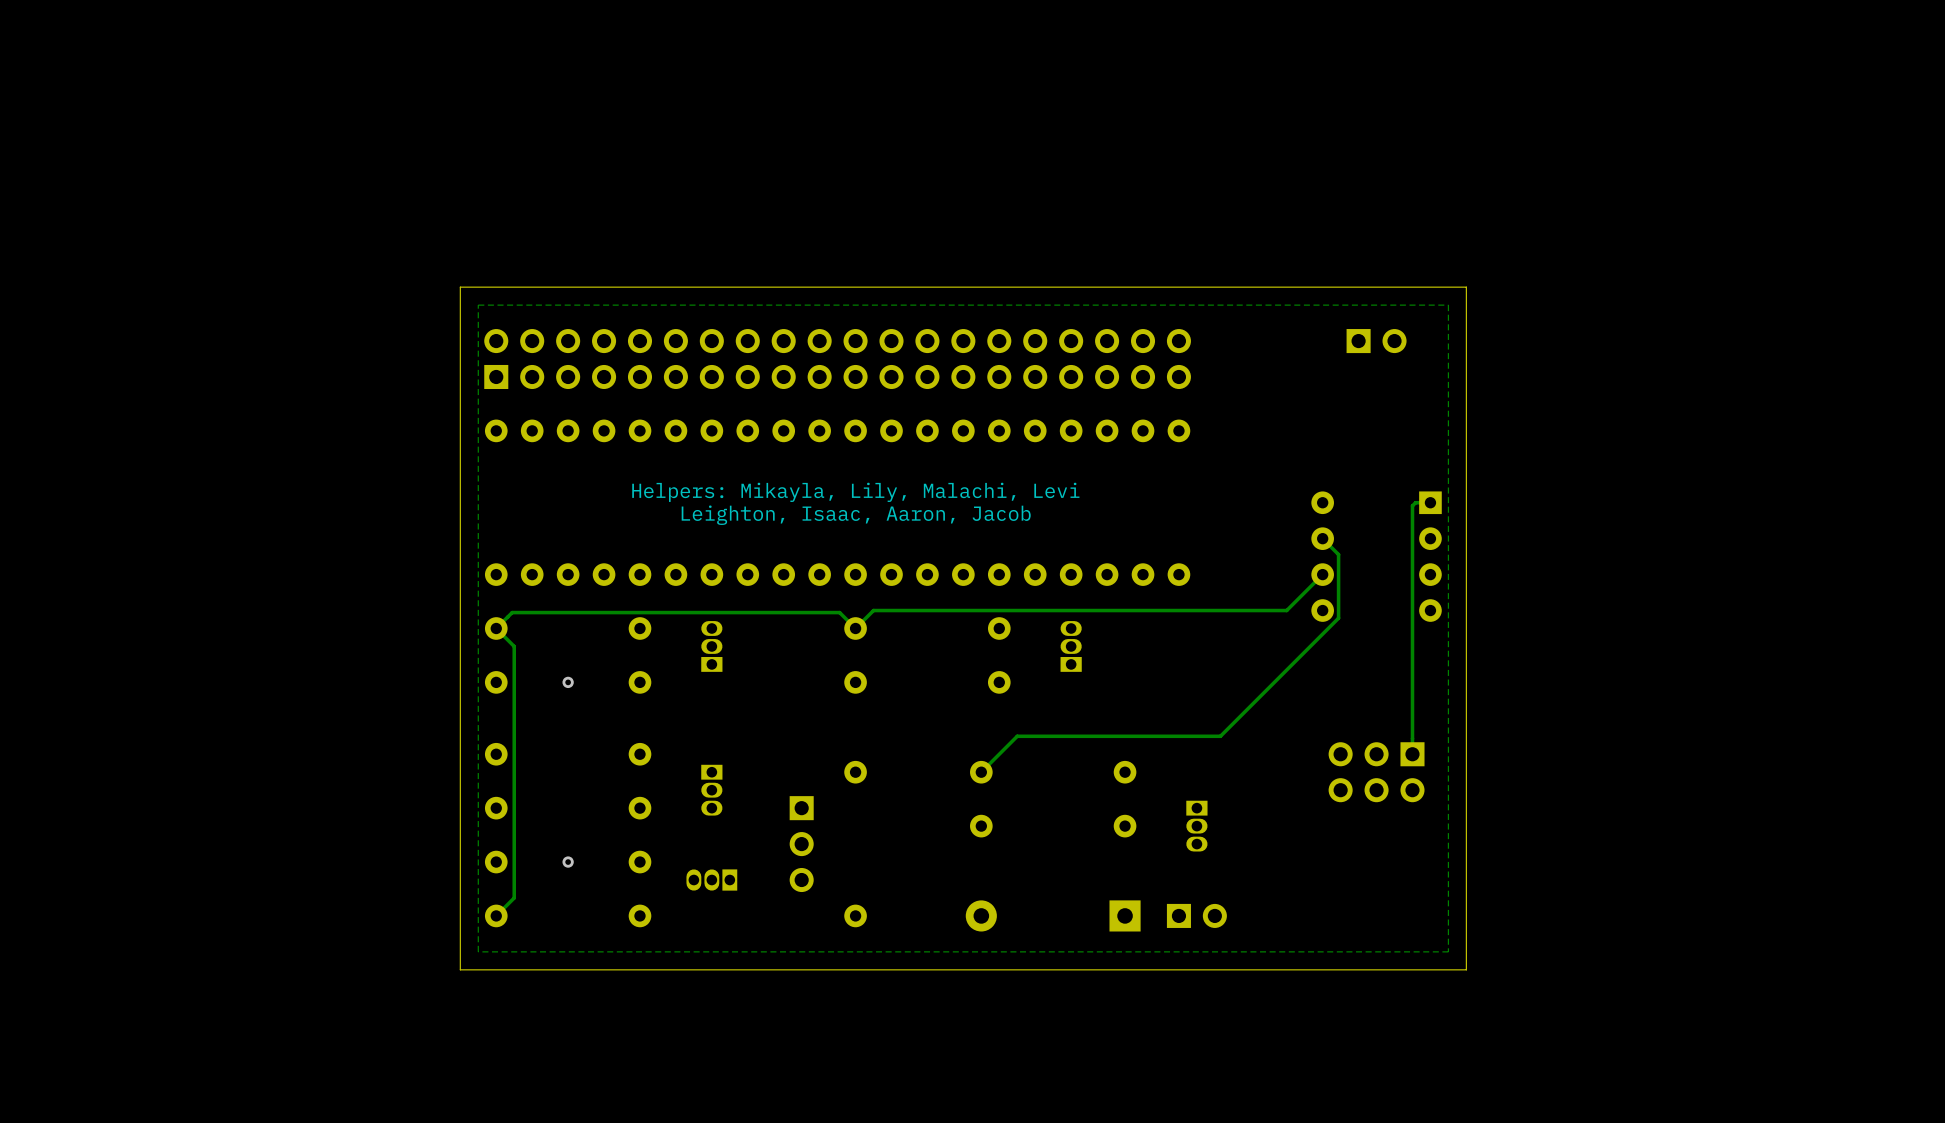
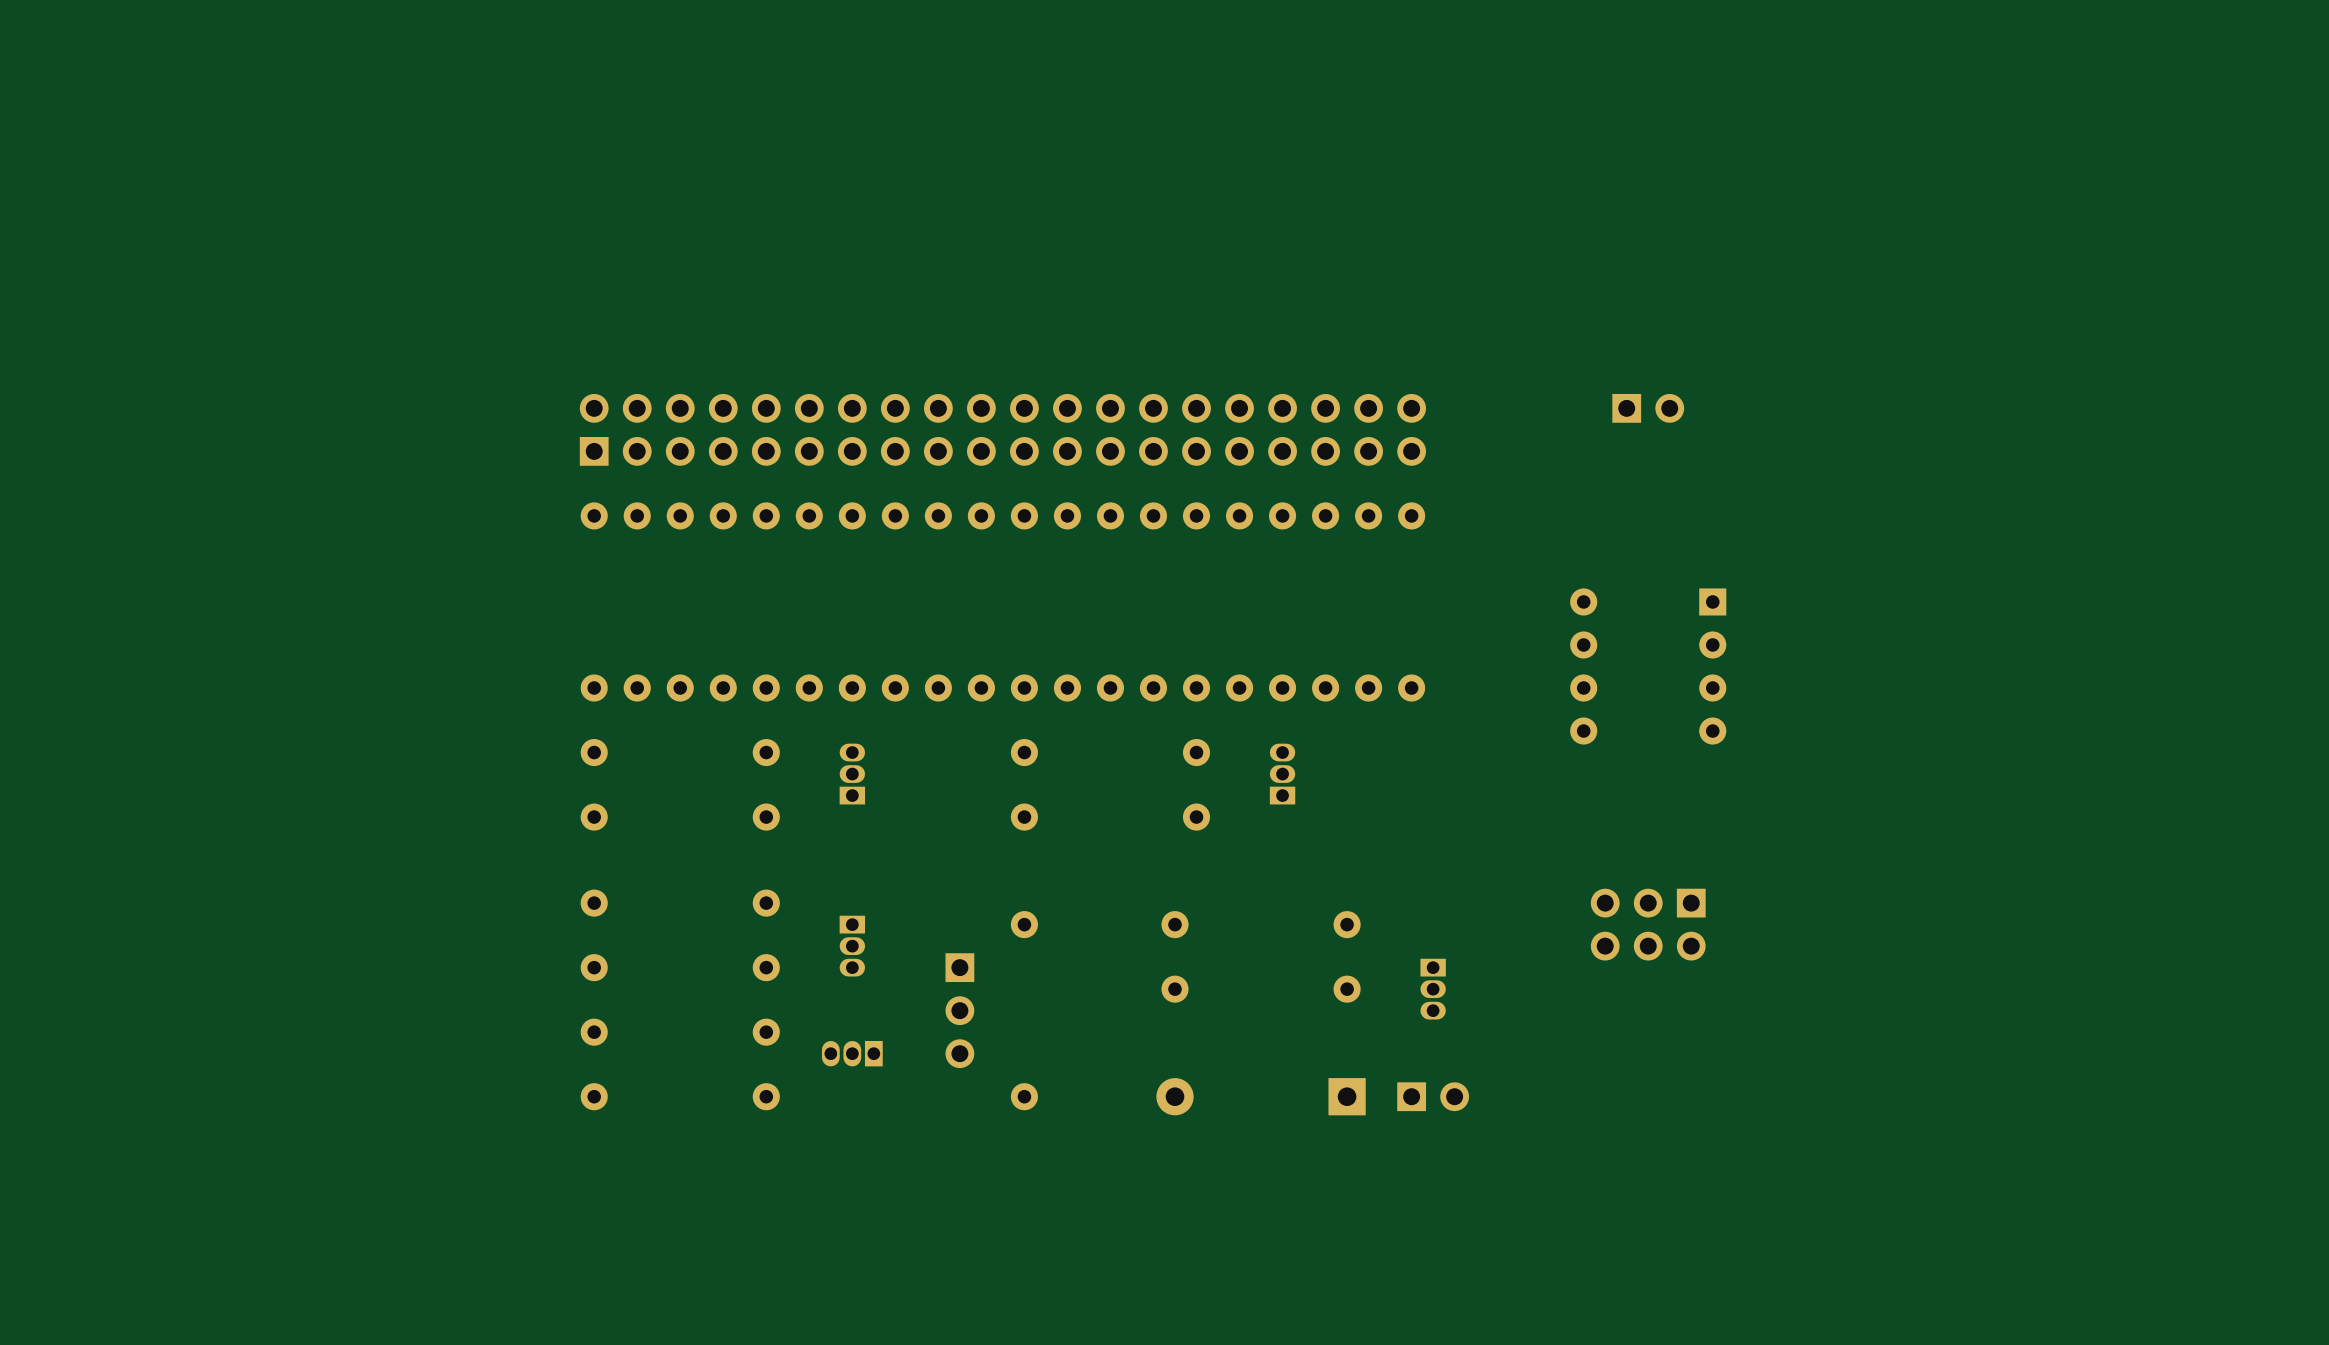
board edge: (1466, 287) (460, 287) (460, 969) (1466, 969) (1466, 287) -> none
zone outline: (1448, 305) (1448, 951) (478, 951) (478, 305) (1448, 305) -> none
text: Helpers: Mikayla, Lily, Malachi, Levi (855, 492) -> none
track: (1430, 502) (1415, 502) (1412, 505) (1412, 754) -> none
text: Leighton, Isaac, Aaron, Jacob (856, 515) -> none
track: (1322, 538) (1338, 554) (1338, 618) (1220, 736) (1017, 736) (981, 772) -> none
track: (1322, 574) (1286, 610) (873, 610) (855, 628) (839, 612) (512, 612) (496, 628) (514, 646) (514, 897) (496, 915) -> none
via: (568, 682) -> none
via: (568, 862) -> none

